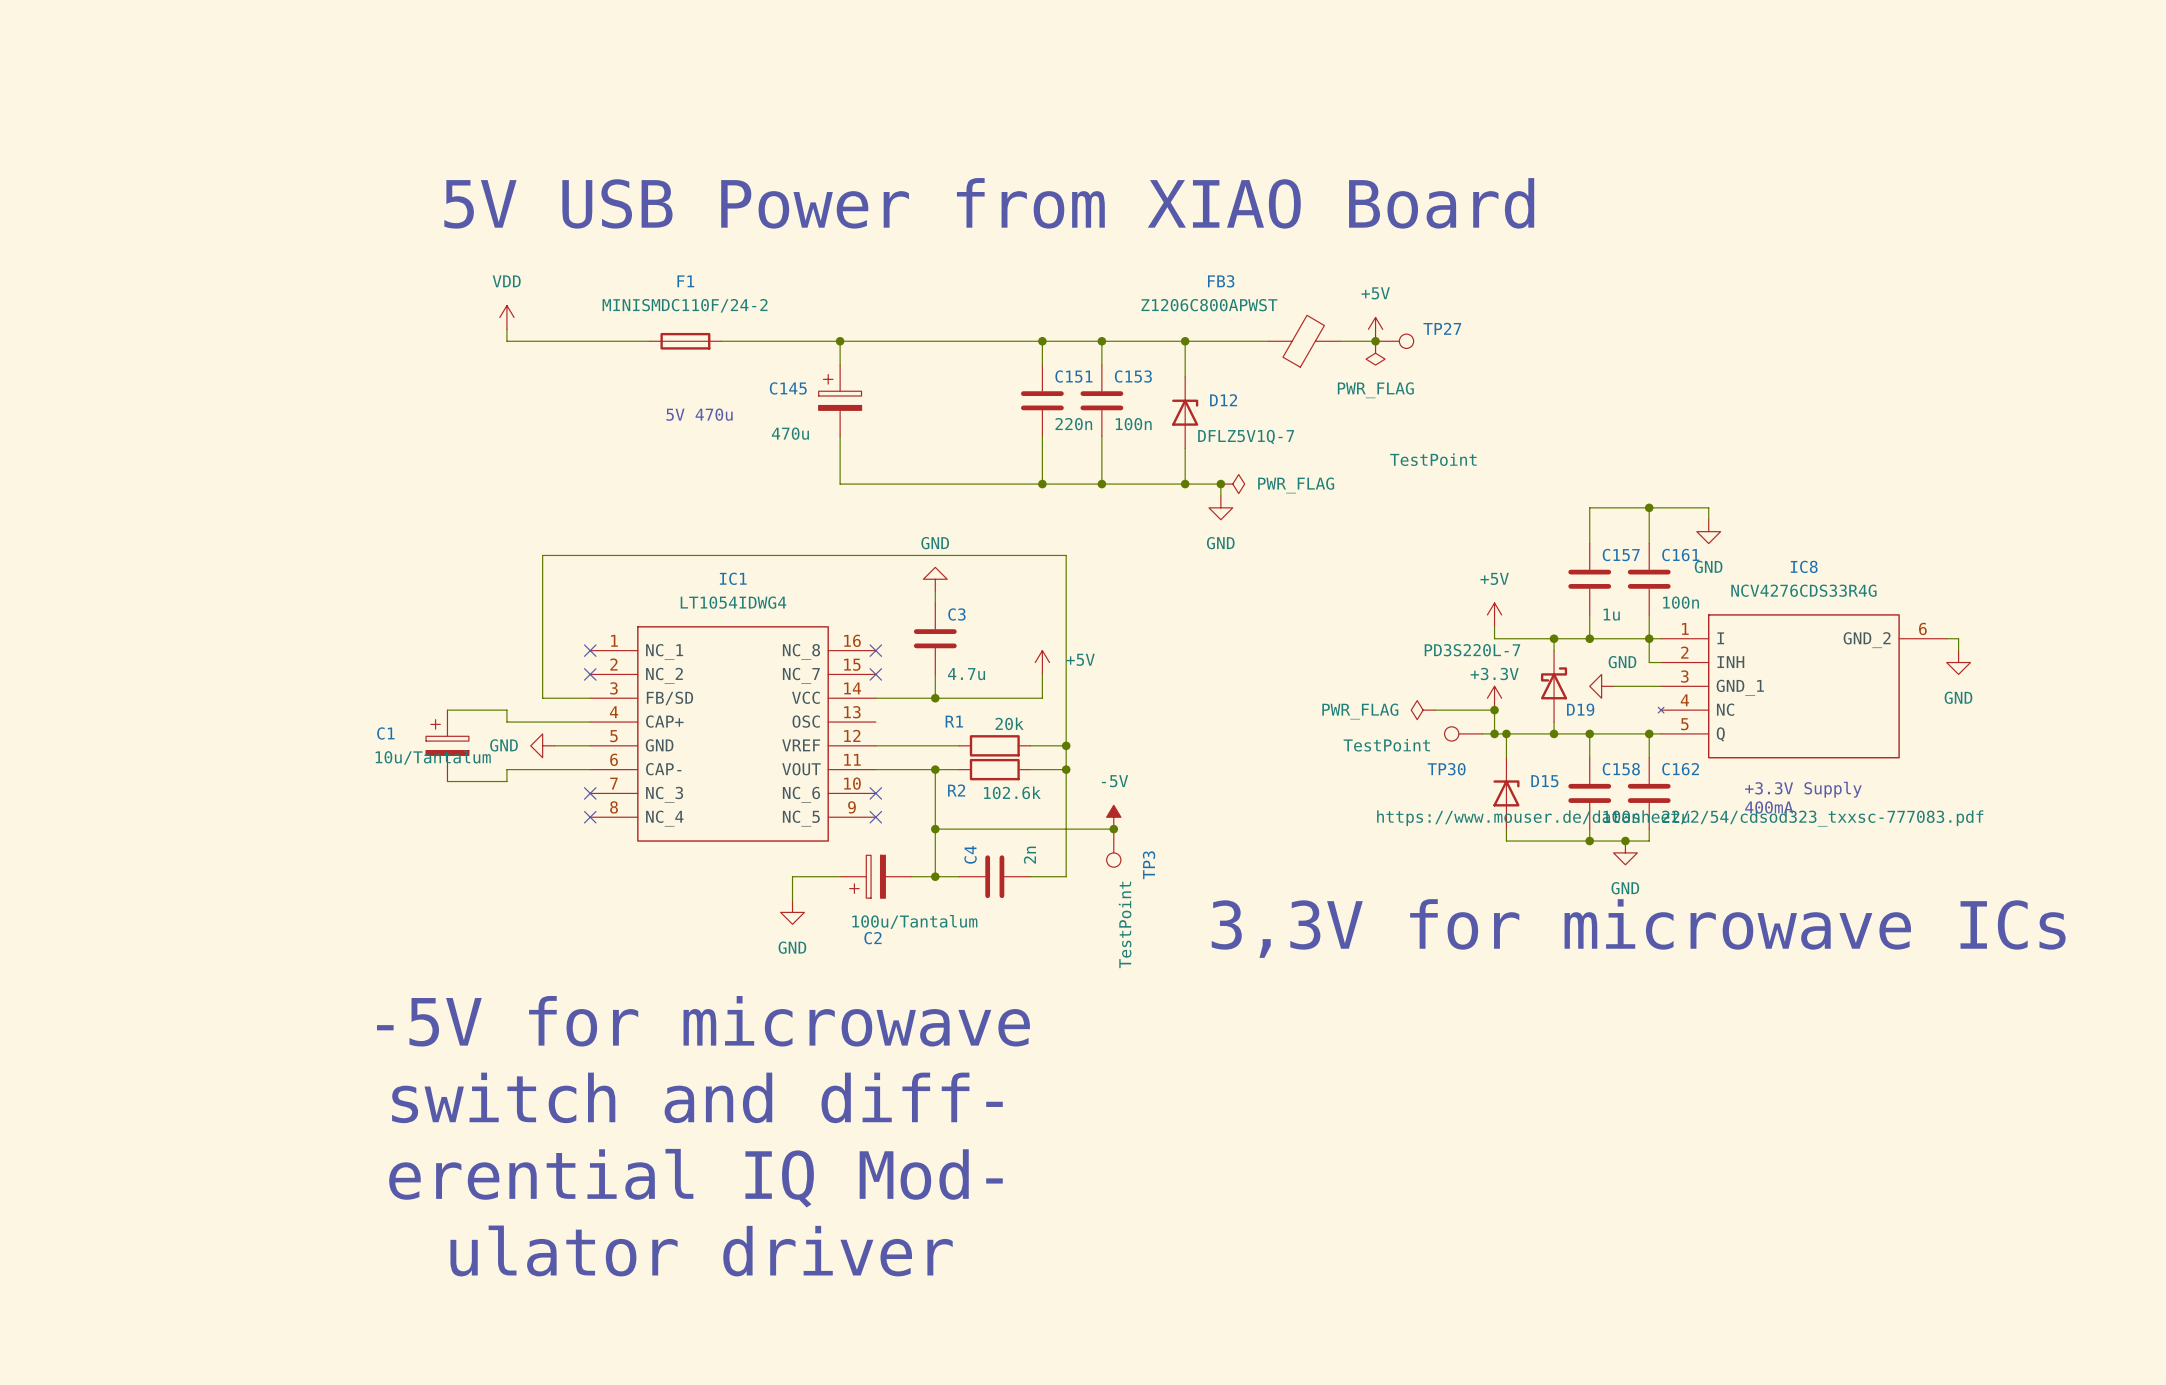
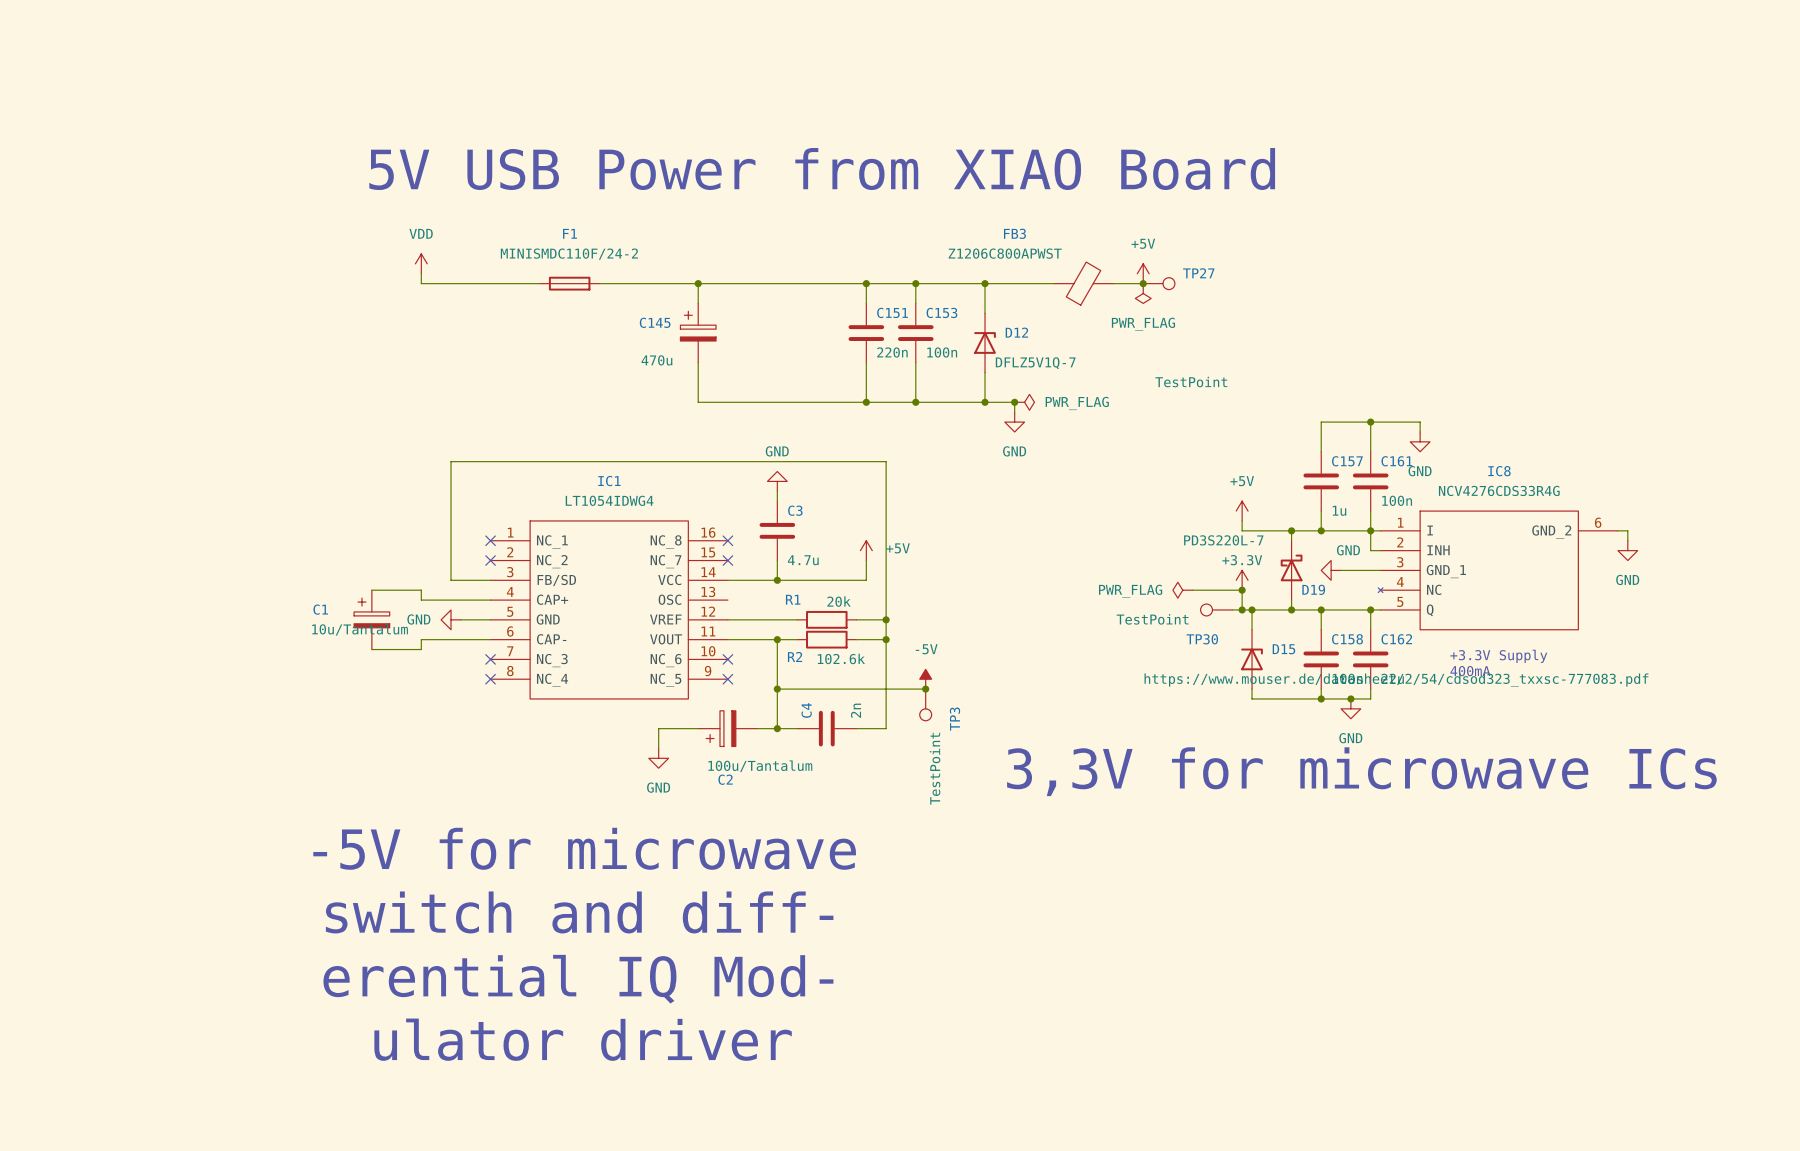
text: 5V 470u (699, 414) -> none

